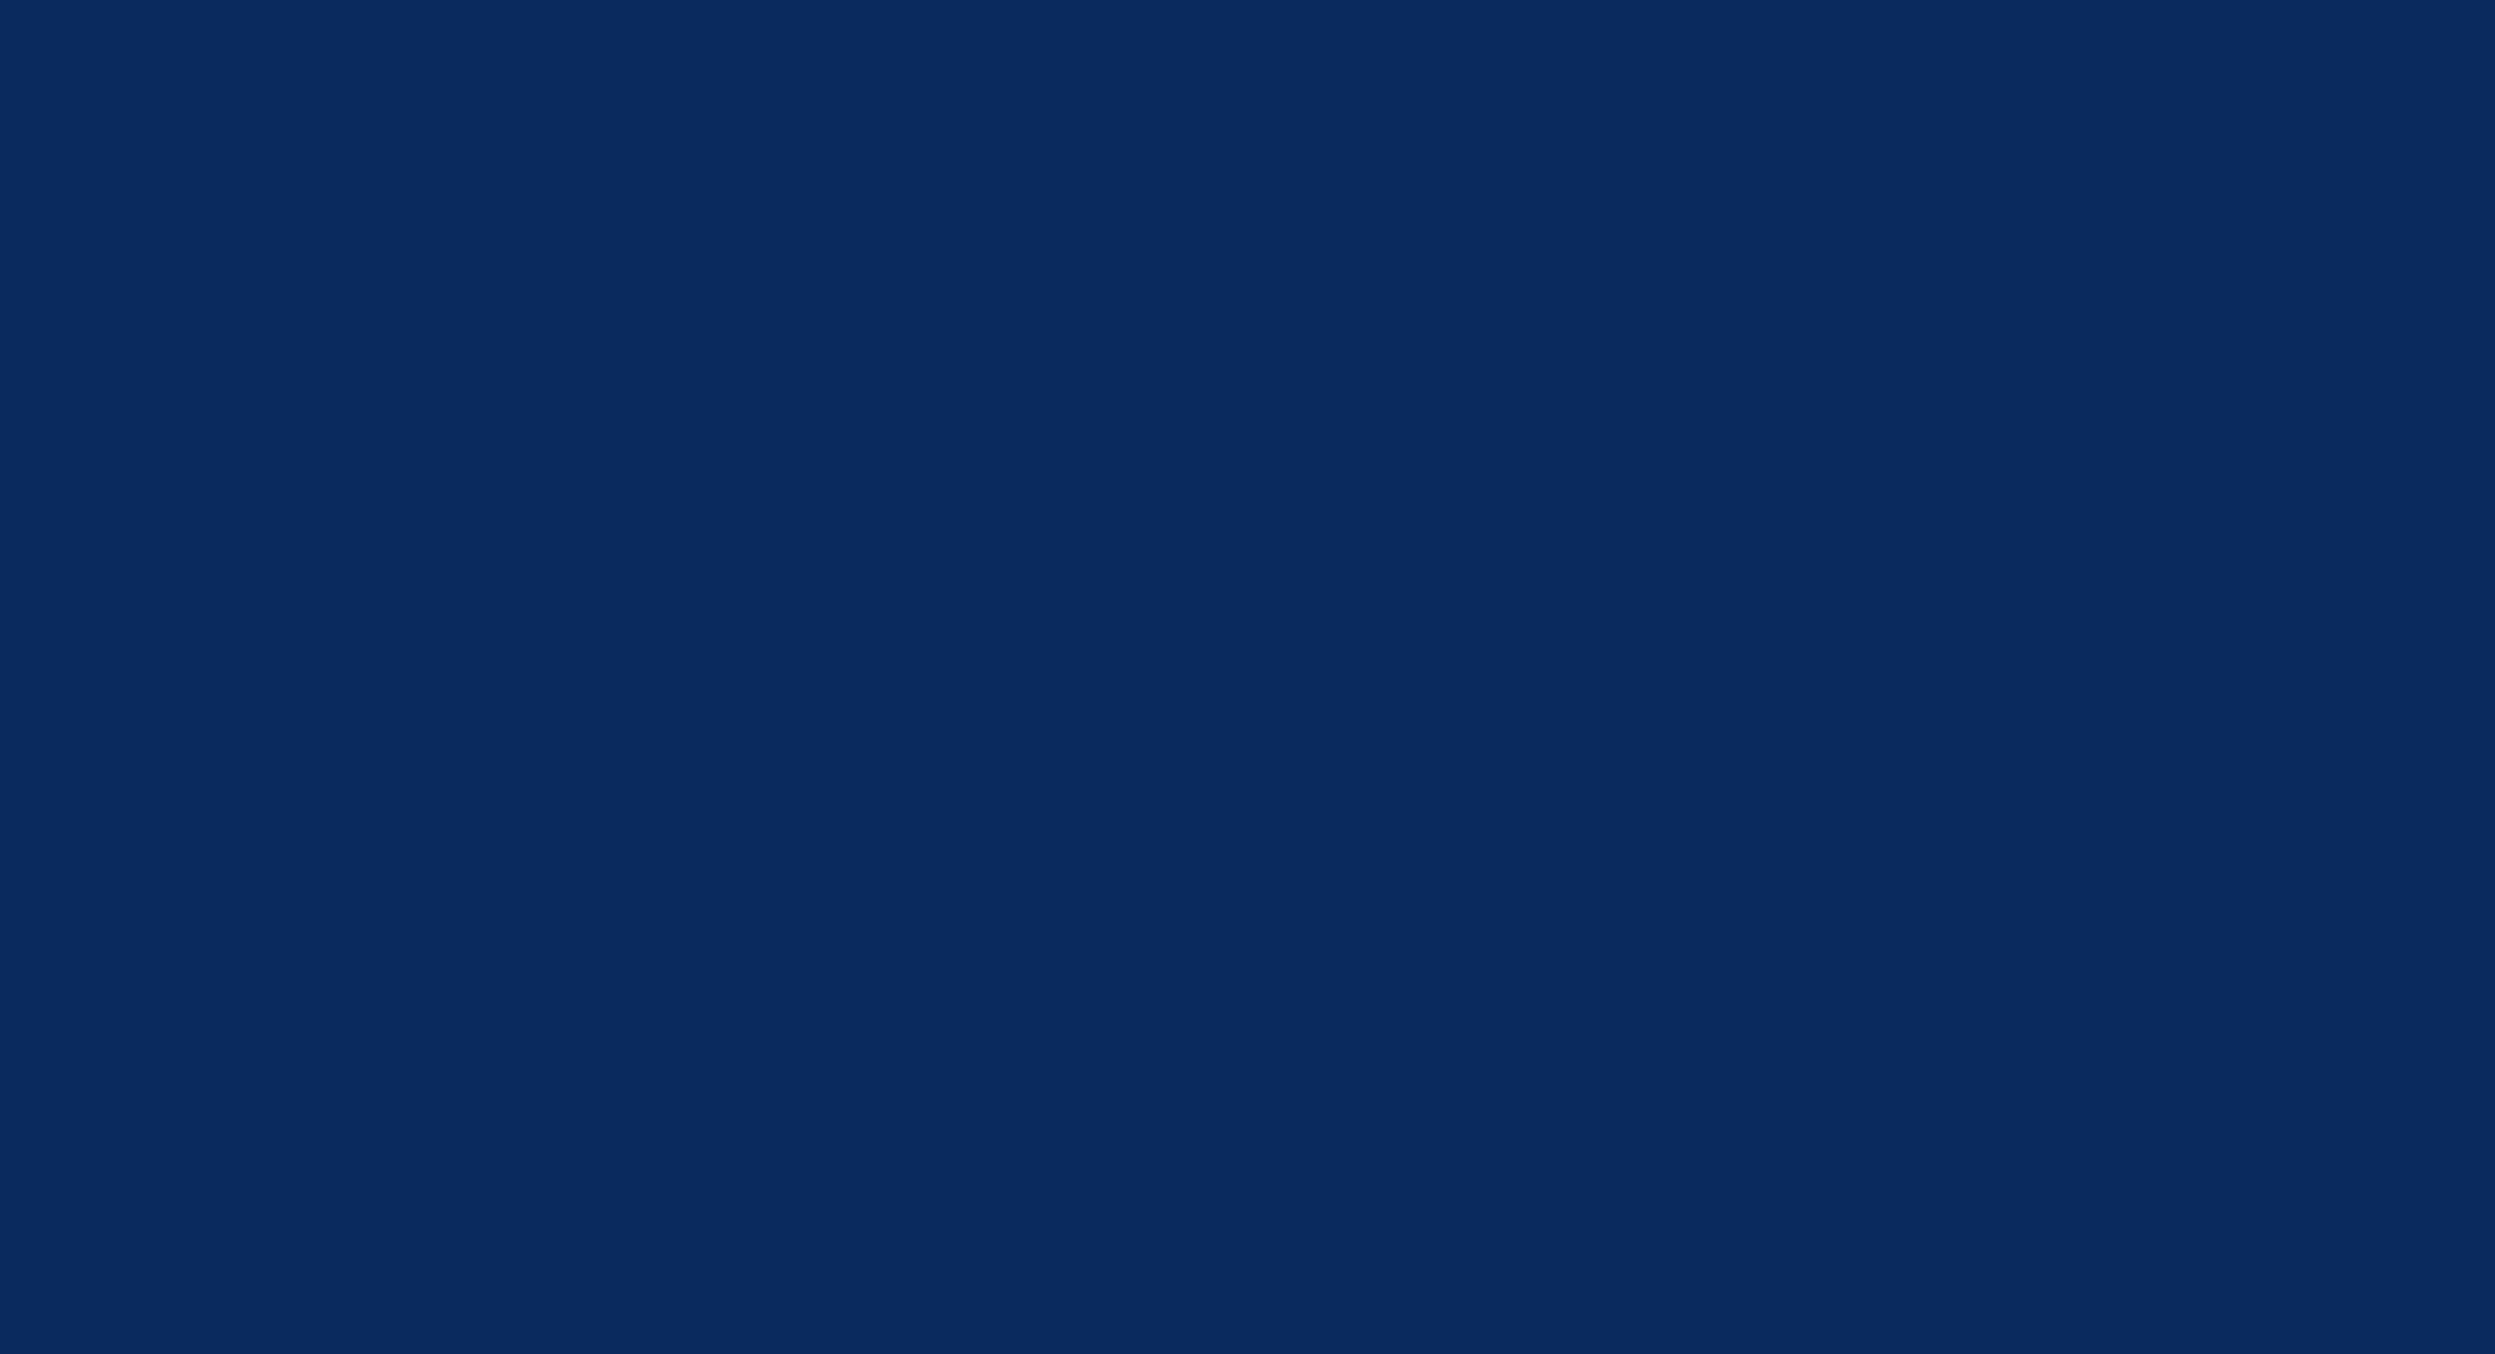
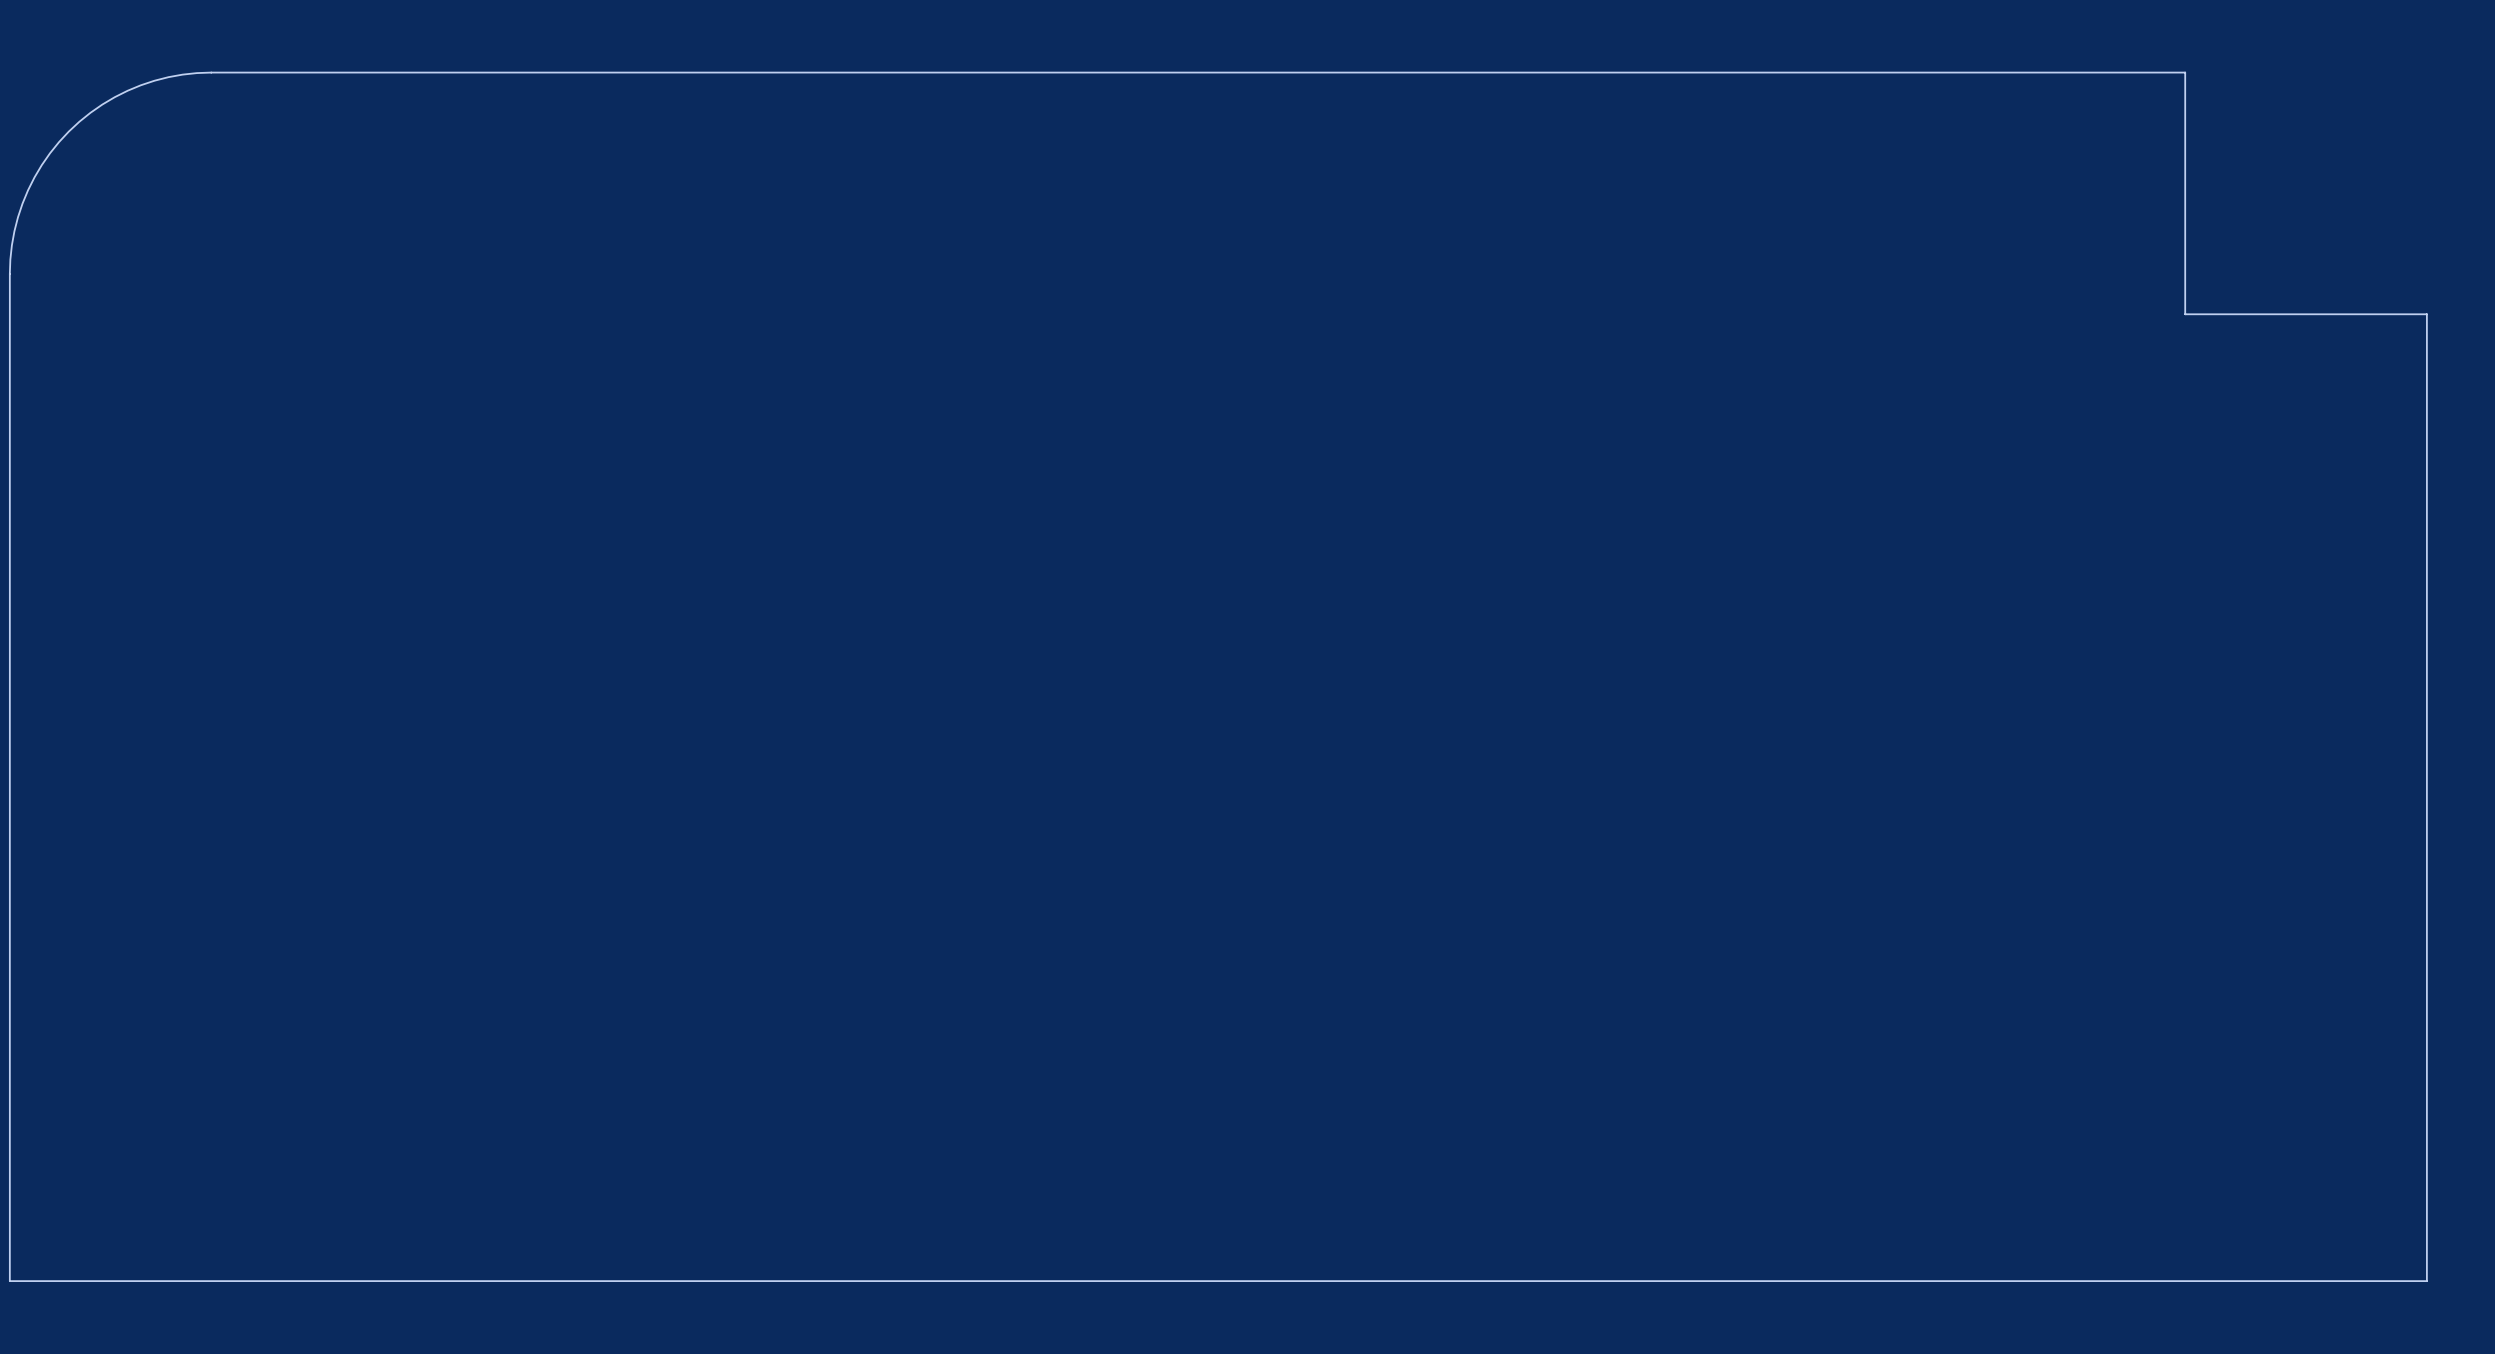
board edge: none -> (211, 72) (2185, 72) (2185, 314) (2426, 314) (2426, 1281) (9, 1281) (9, 273) (11, 245) (18, 217) (34, 177) (50, 153) (79, 121) (114, 97) (140, 85) (168, 77) (211, 72)

